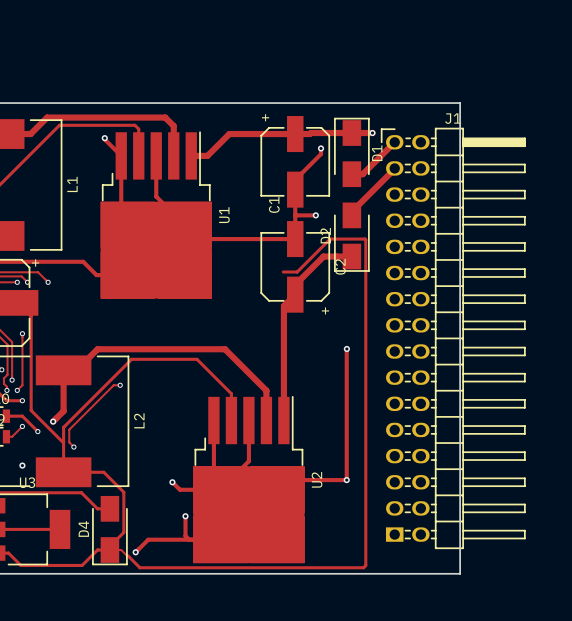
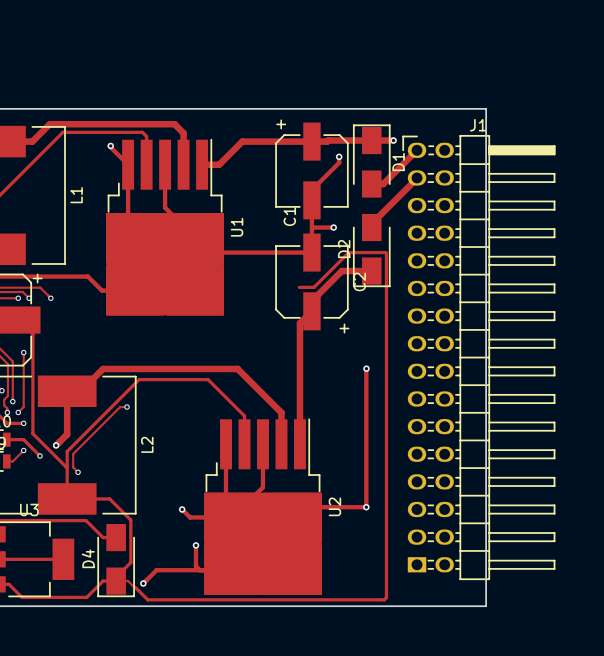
via: (22, 465) -> none

